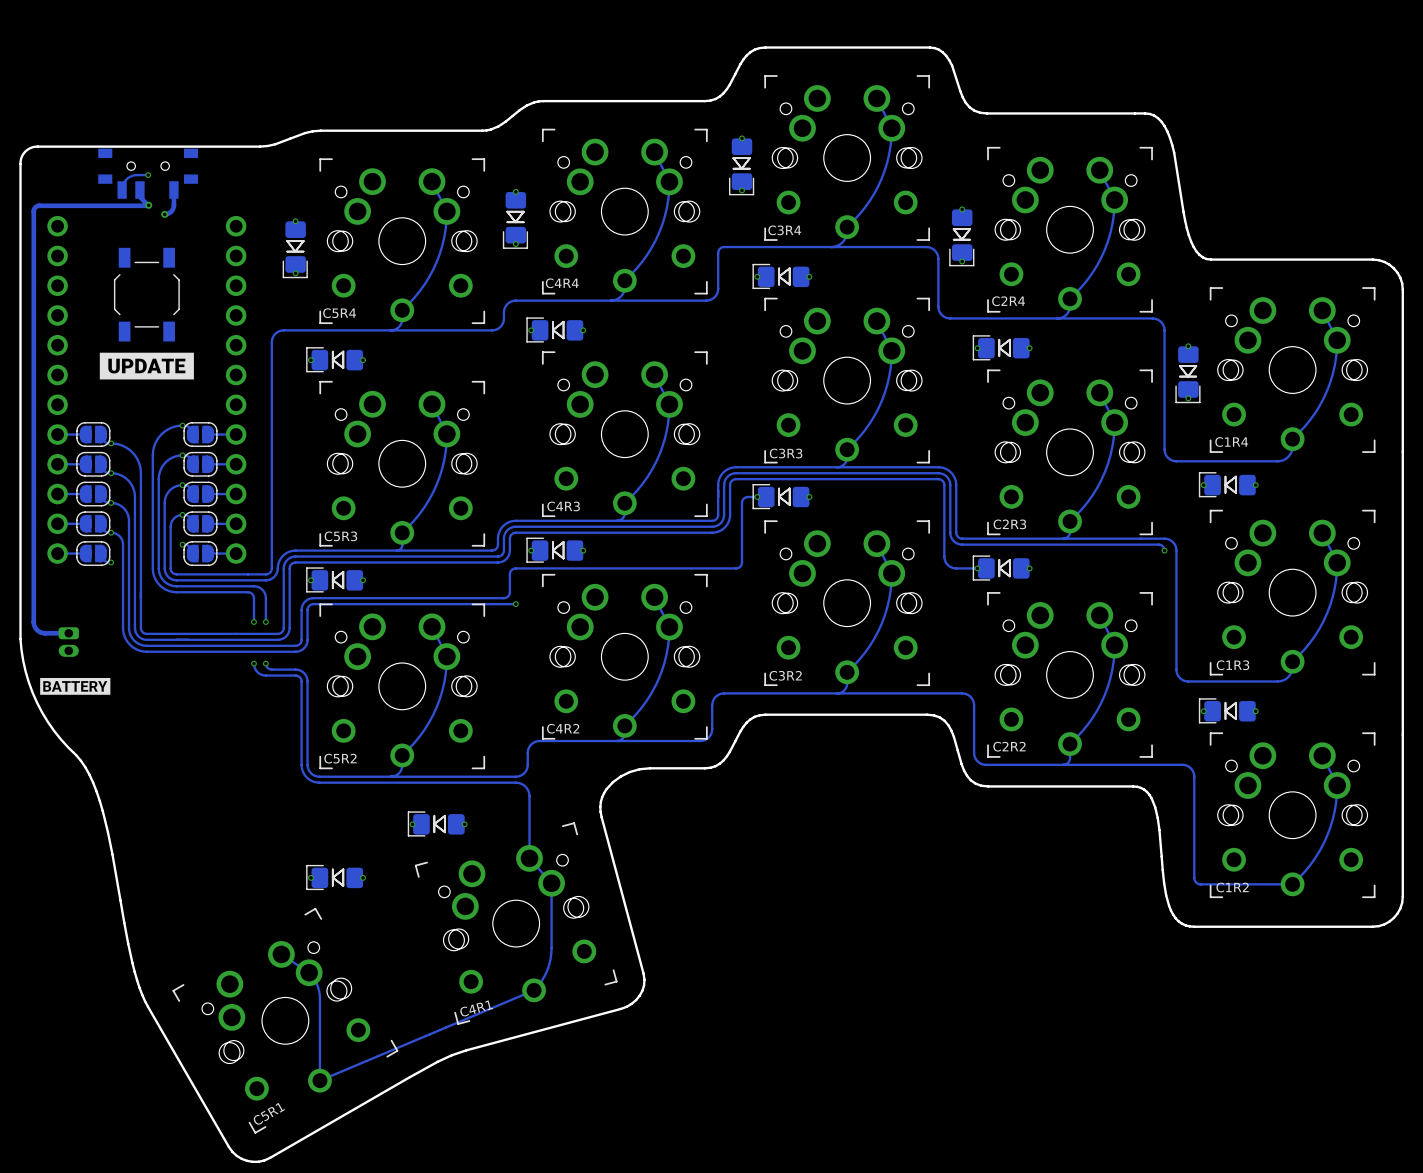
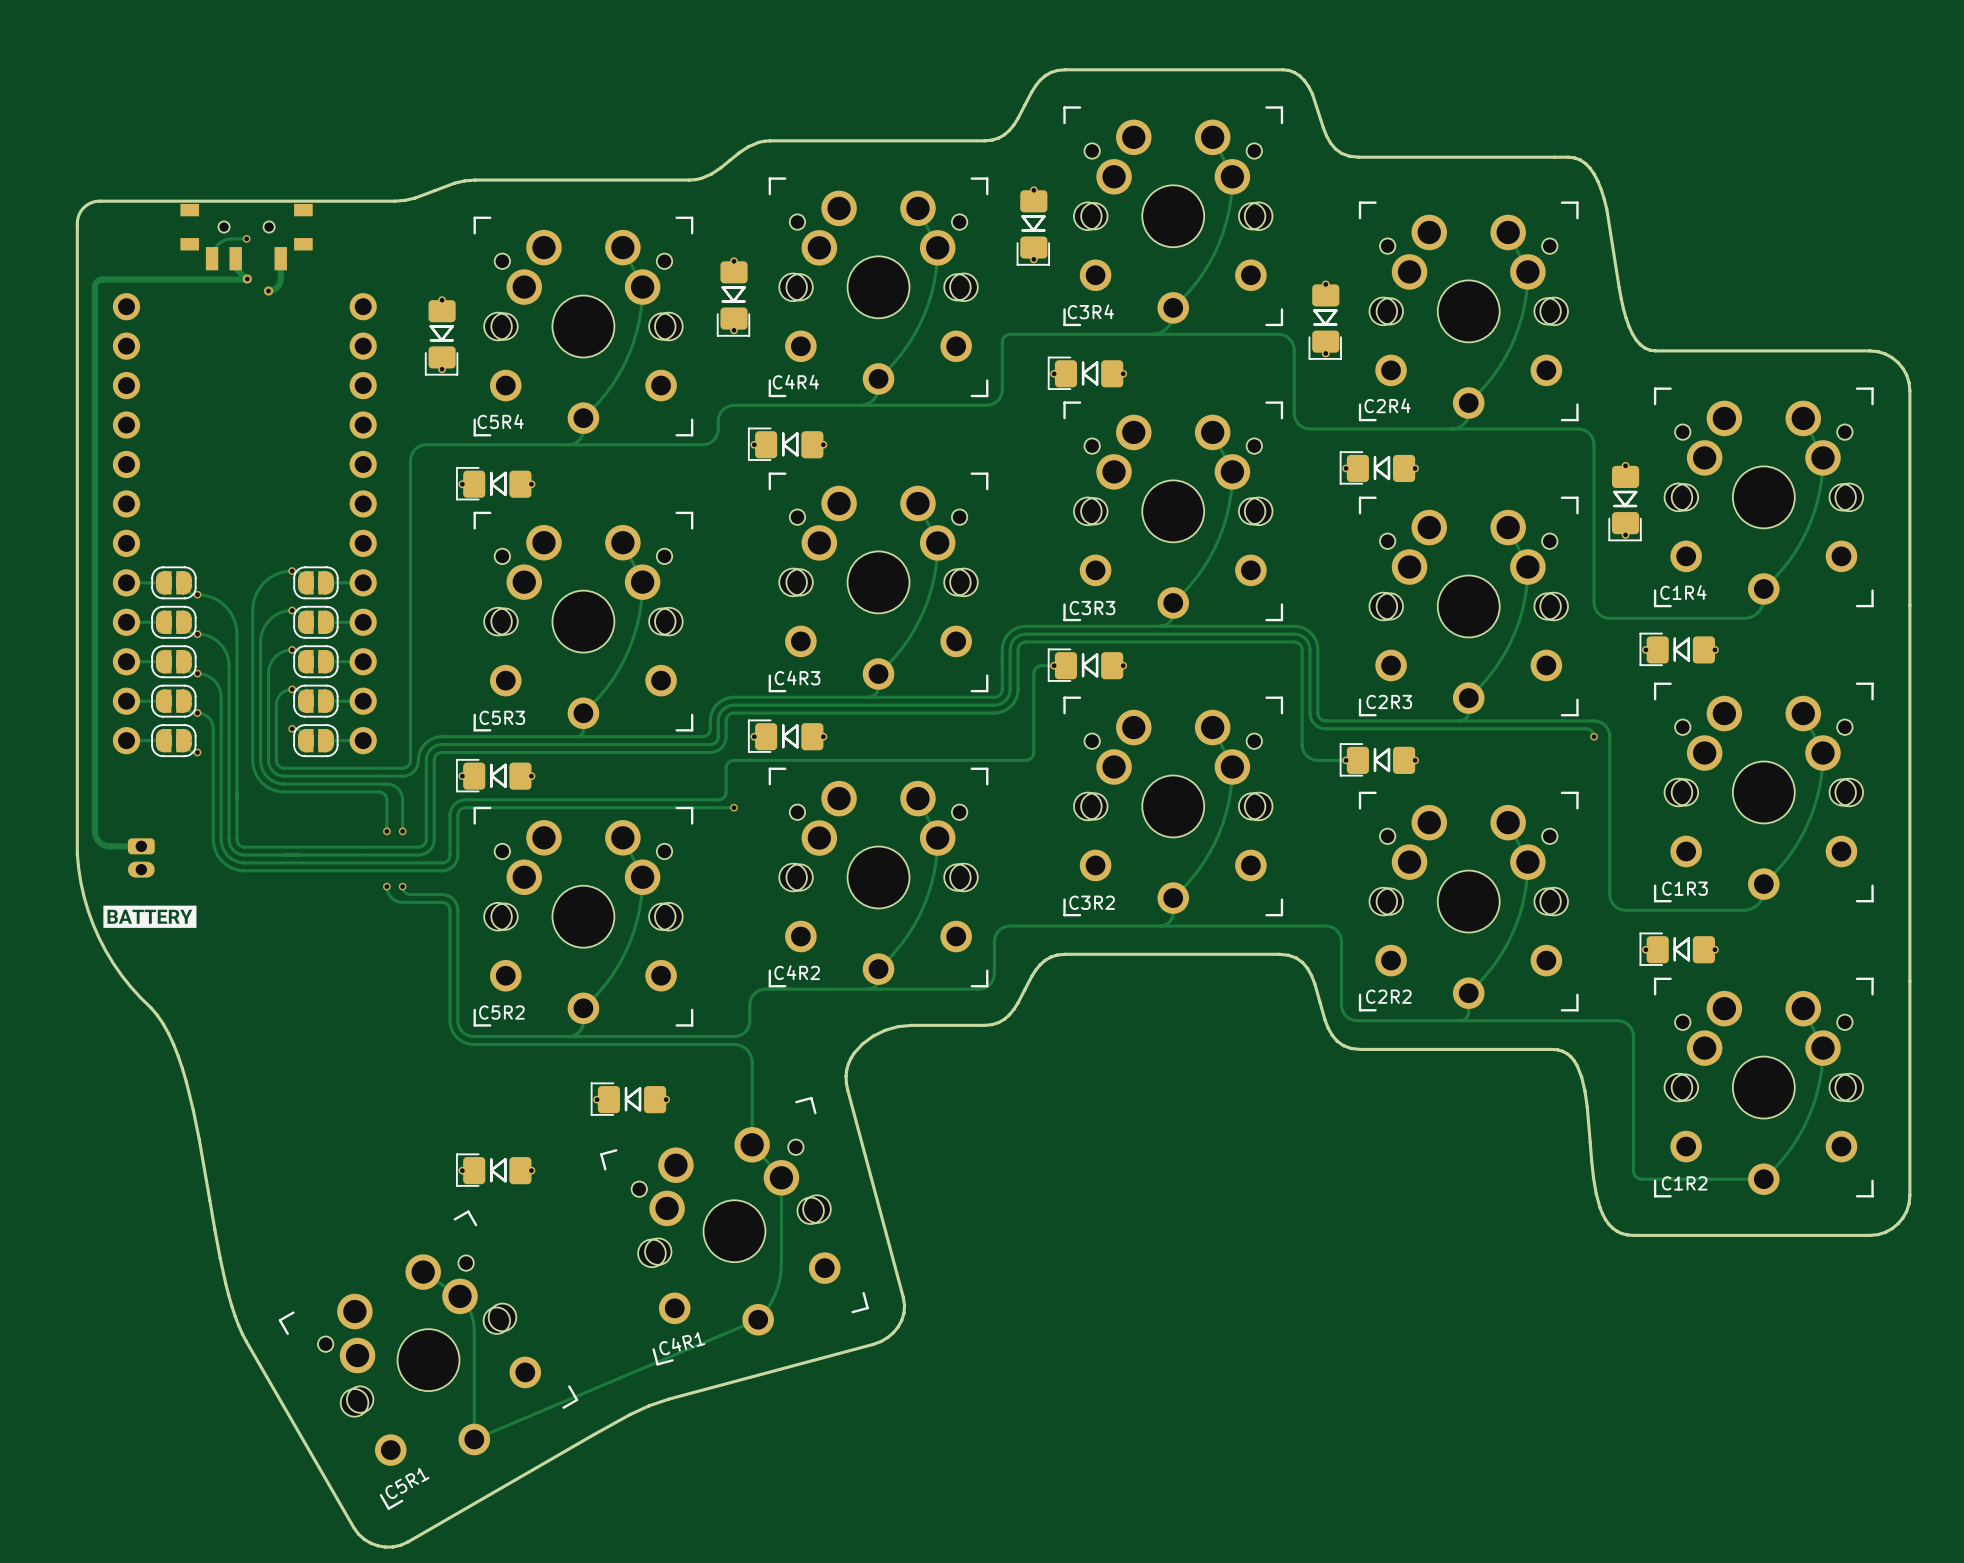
part: (146, 294) -> none
drawing: [99, 352, 194, 380] -> none

